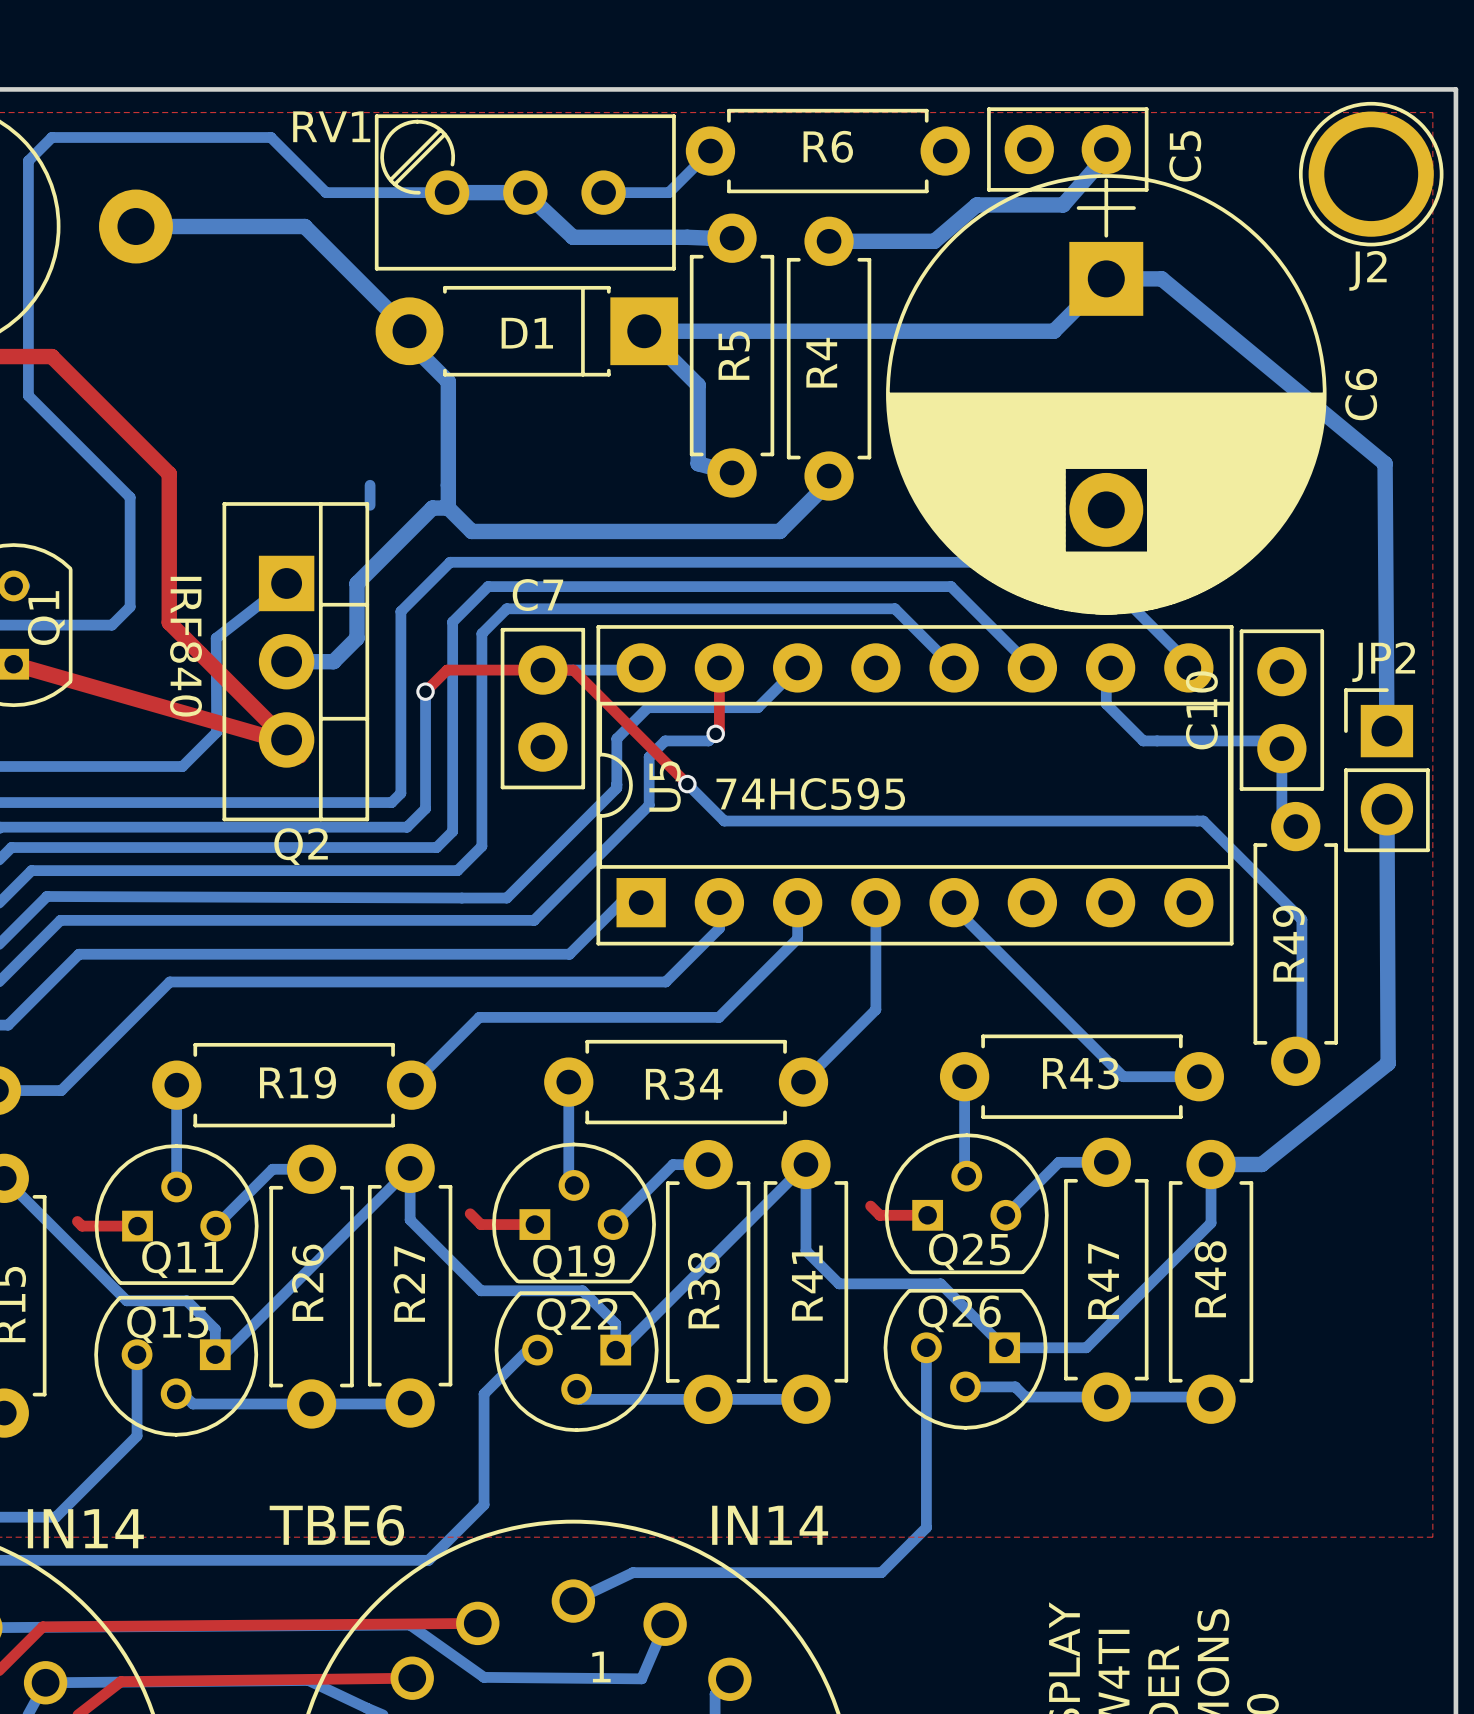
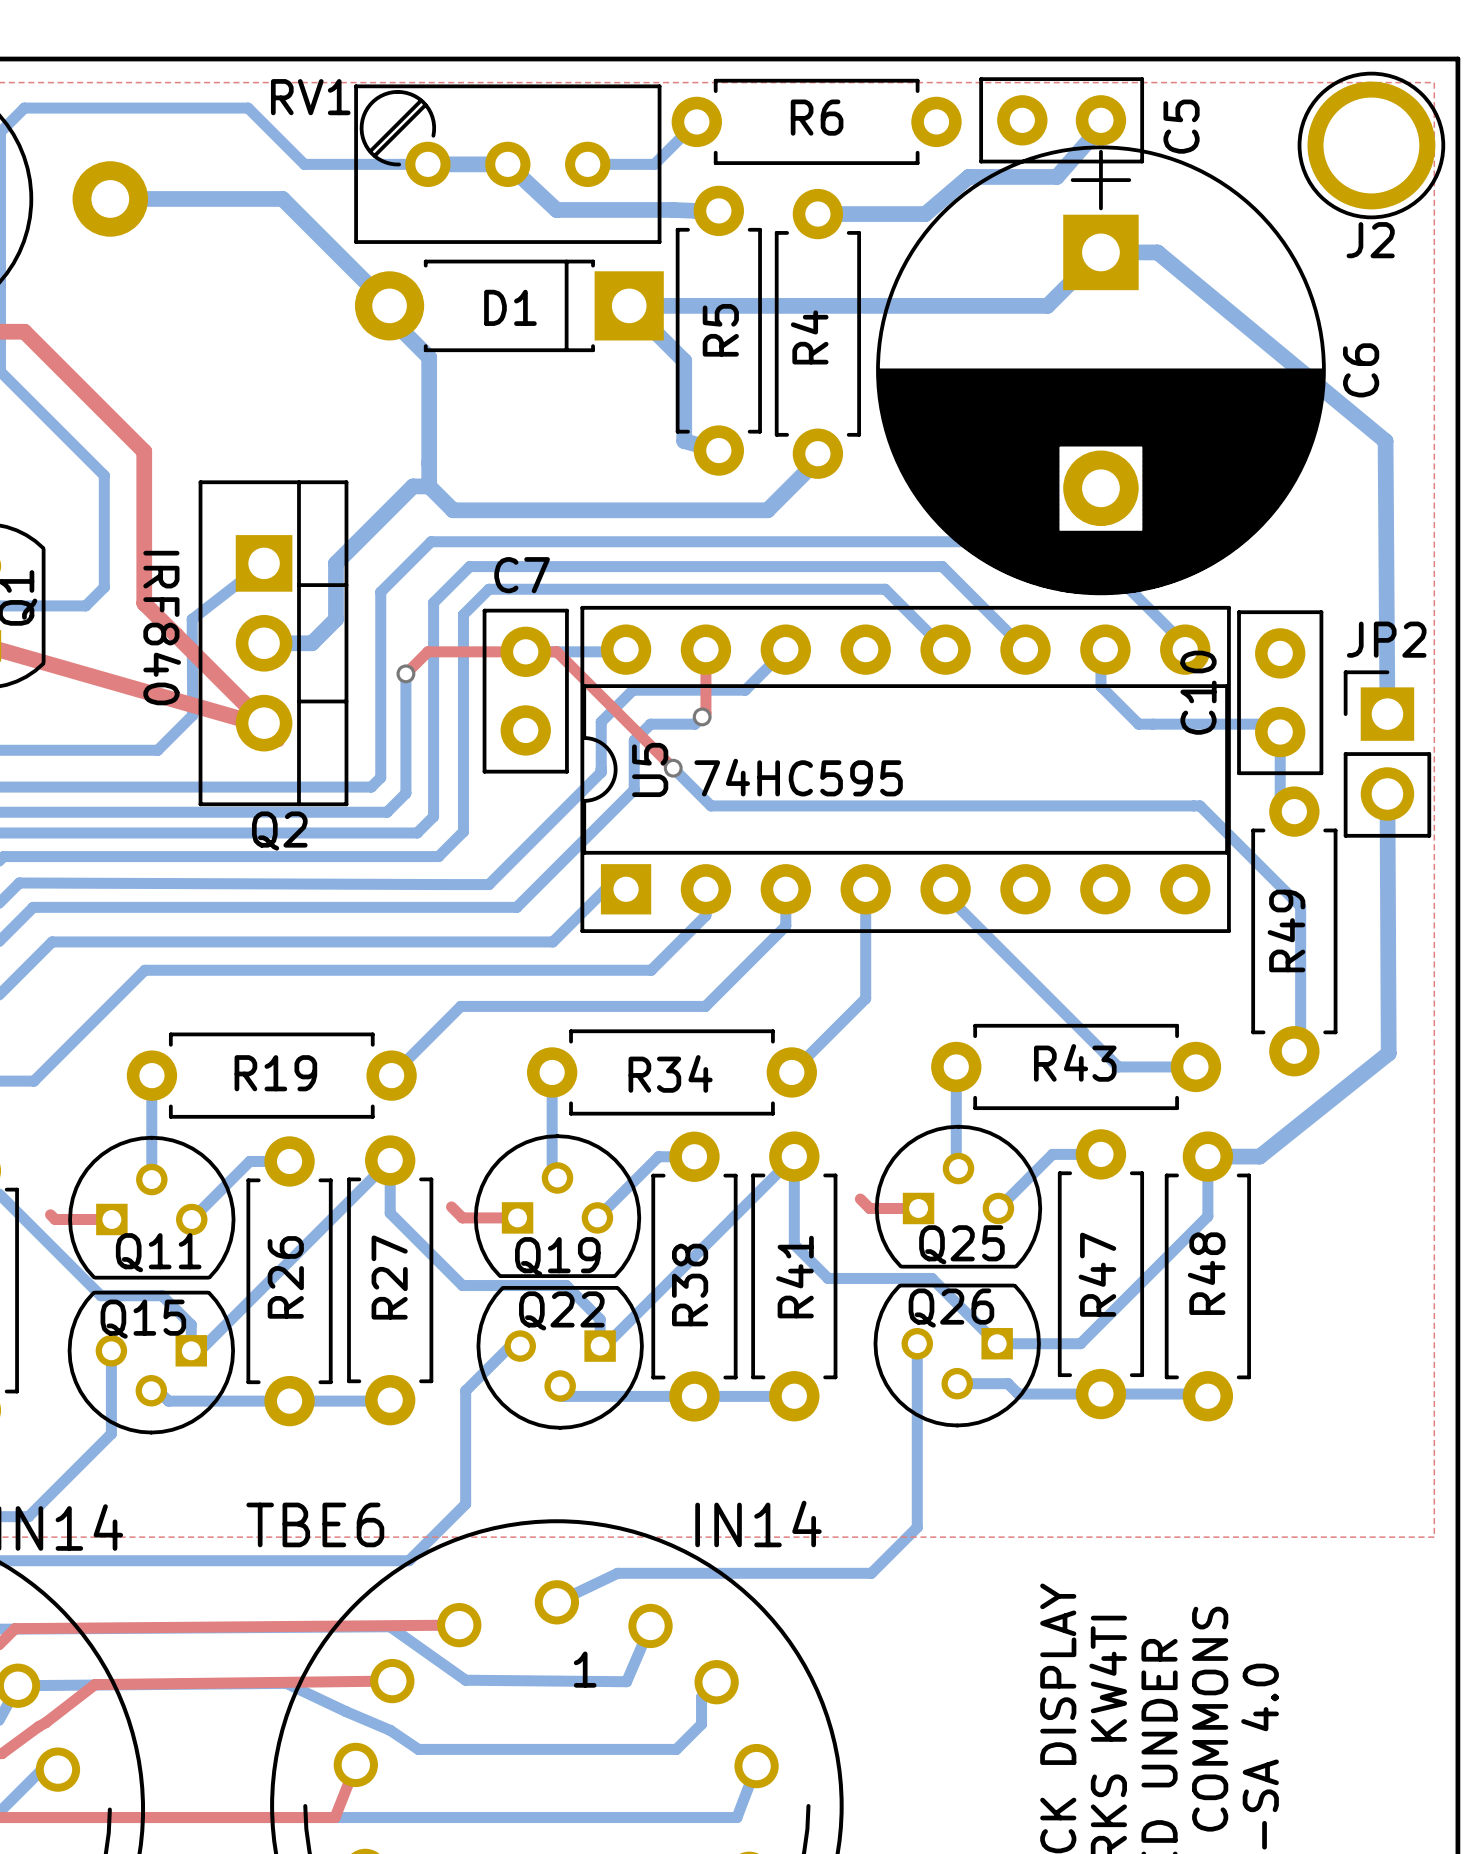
bottom track: (370, 485) (370, 505) -> none

